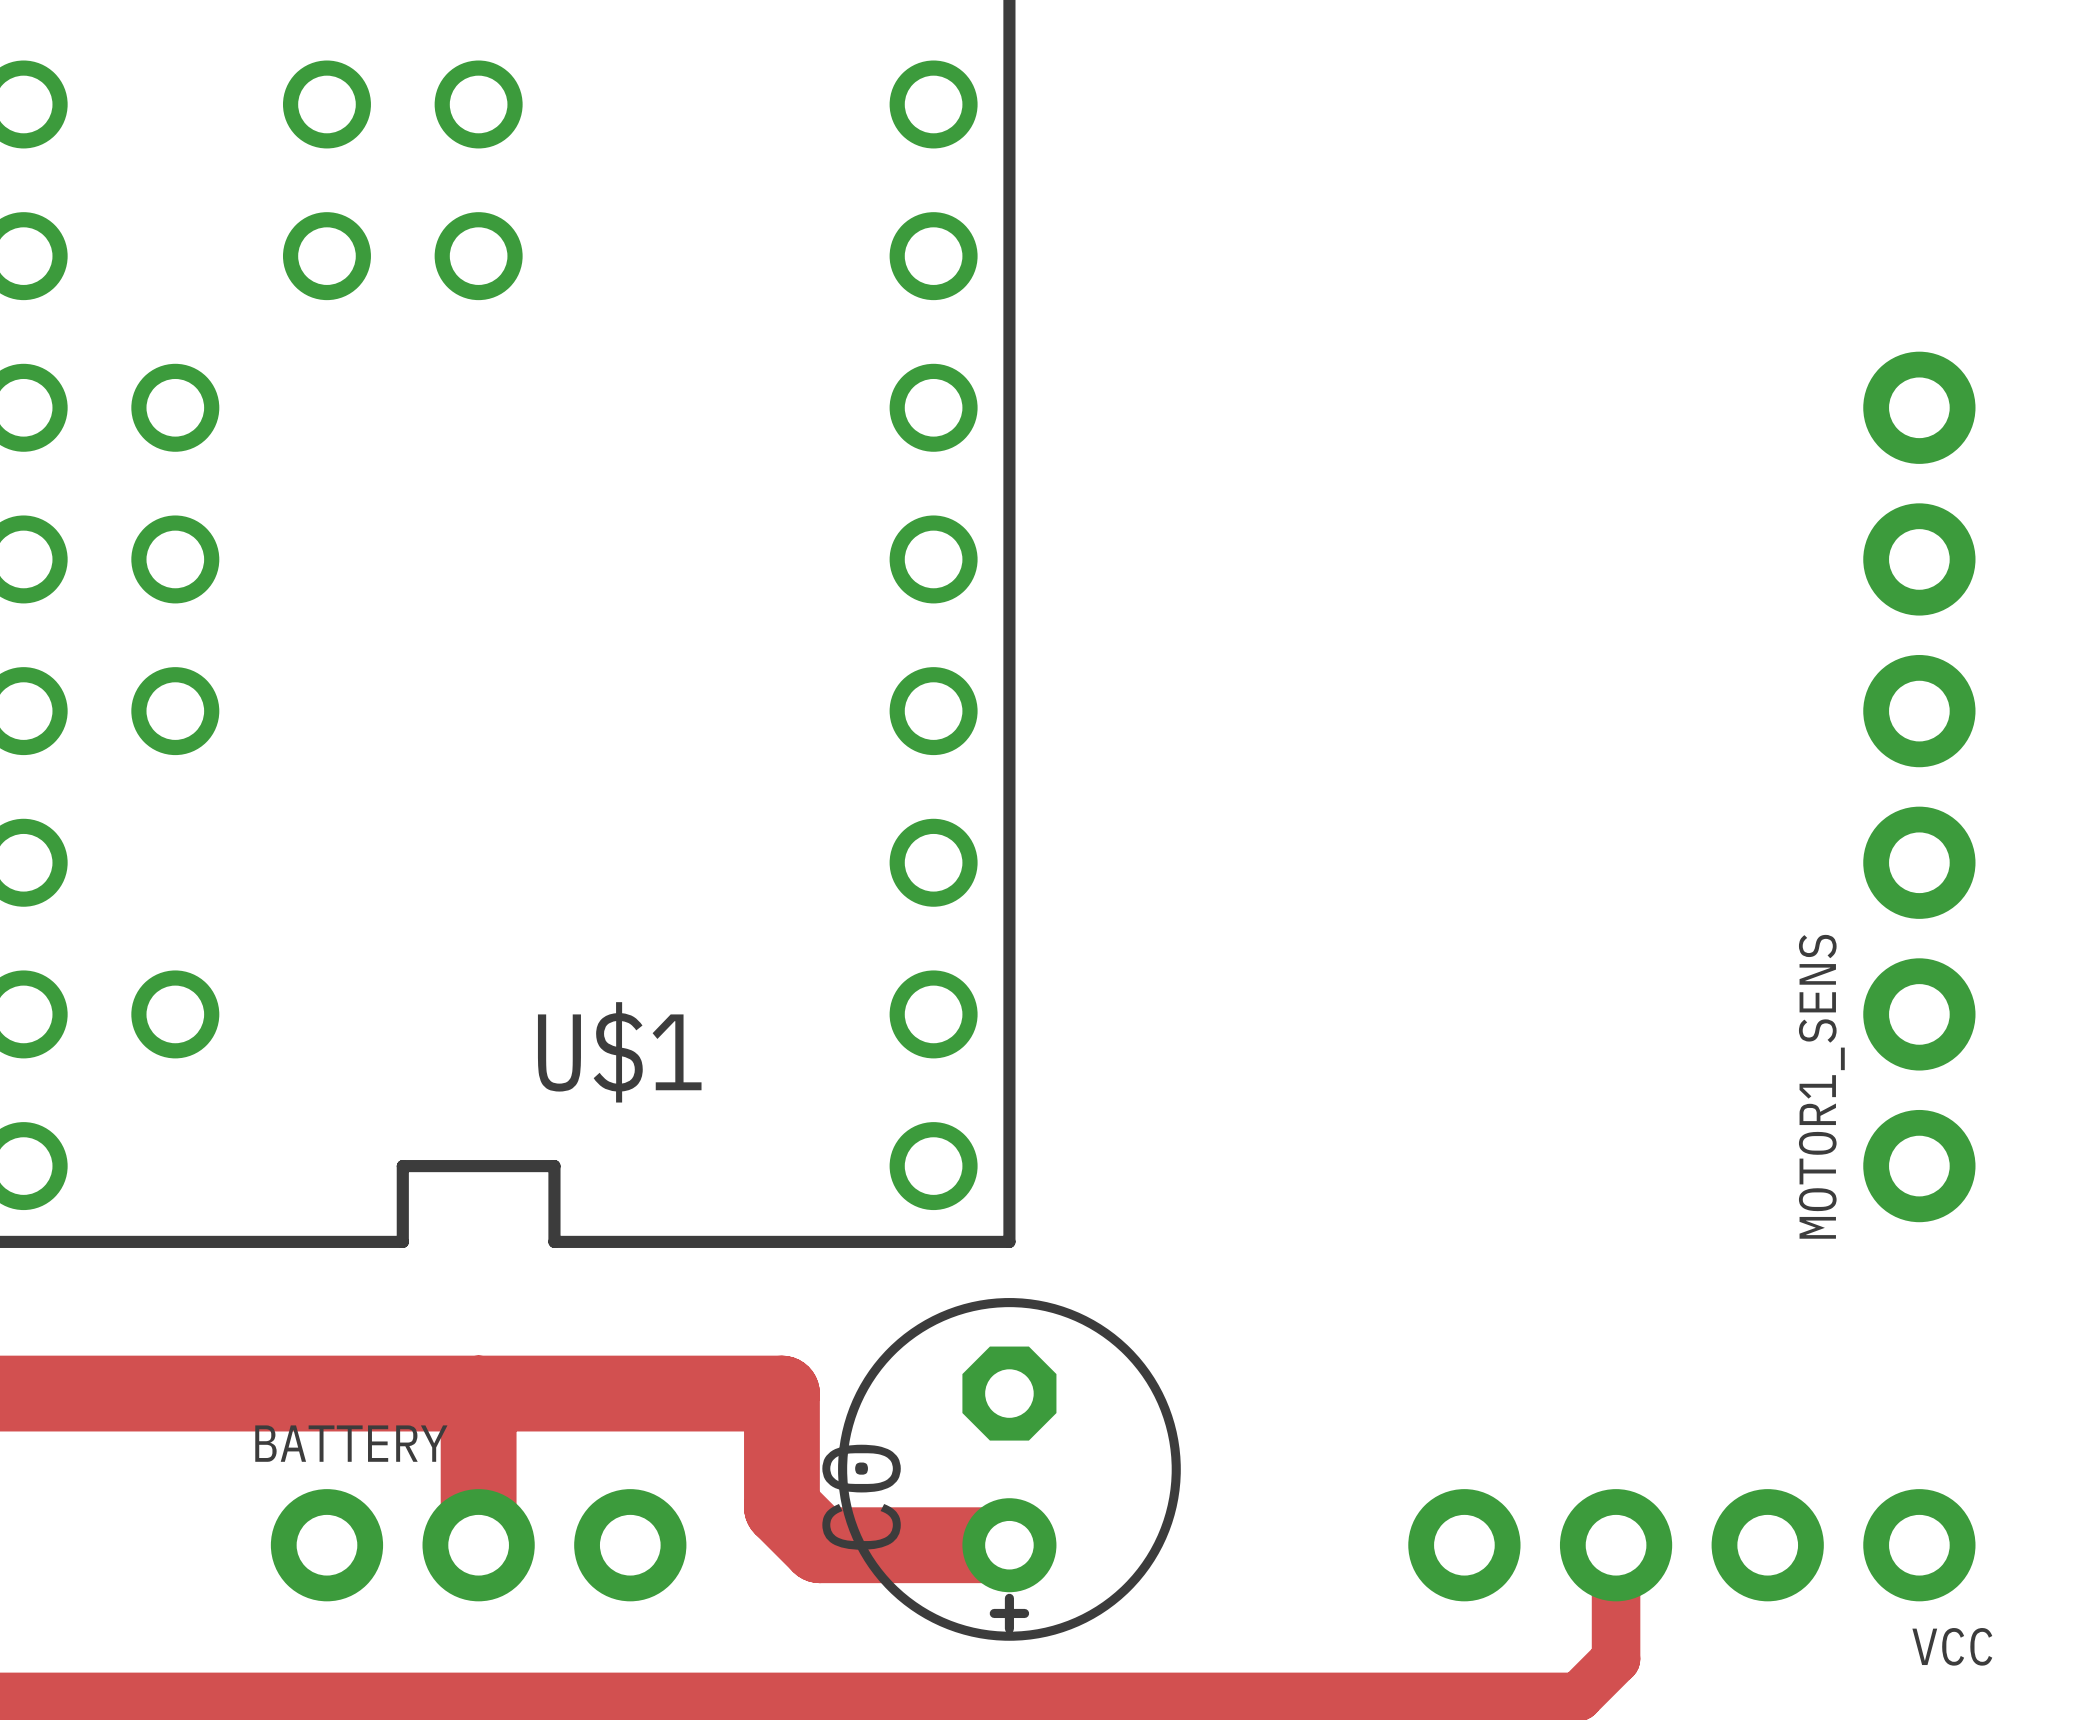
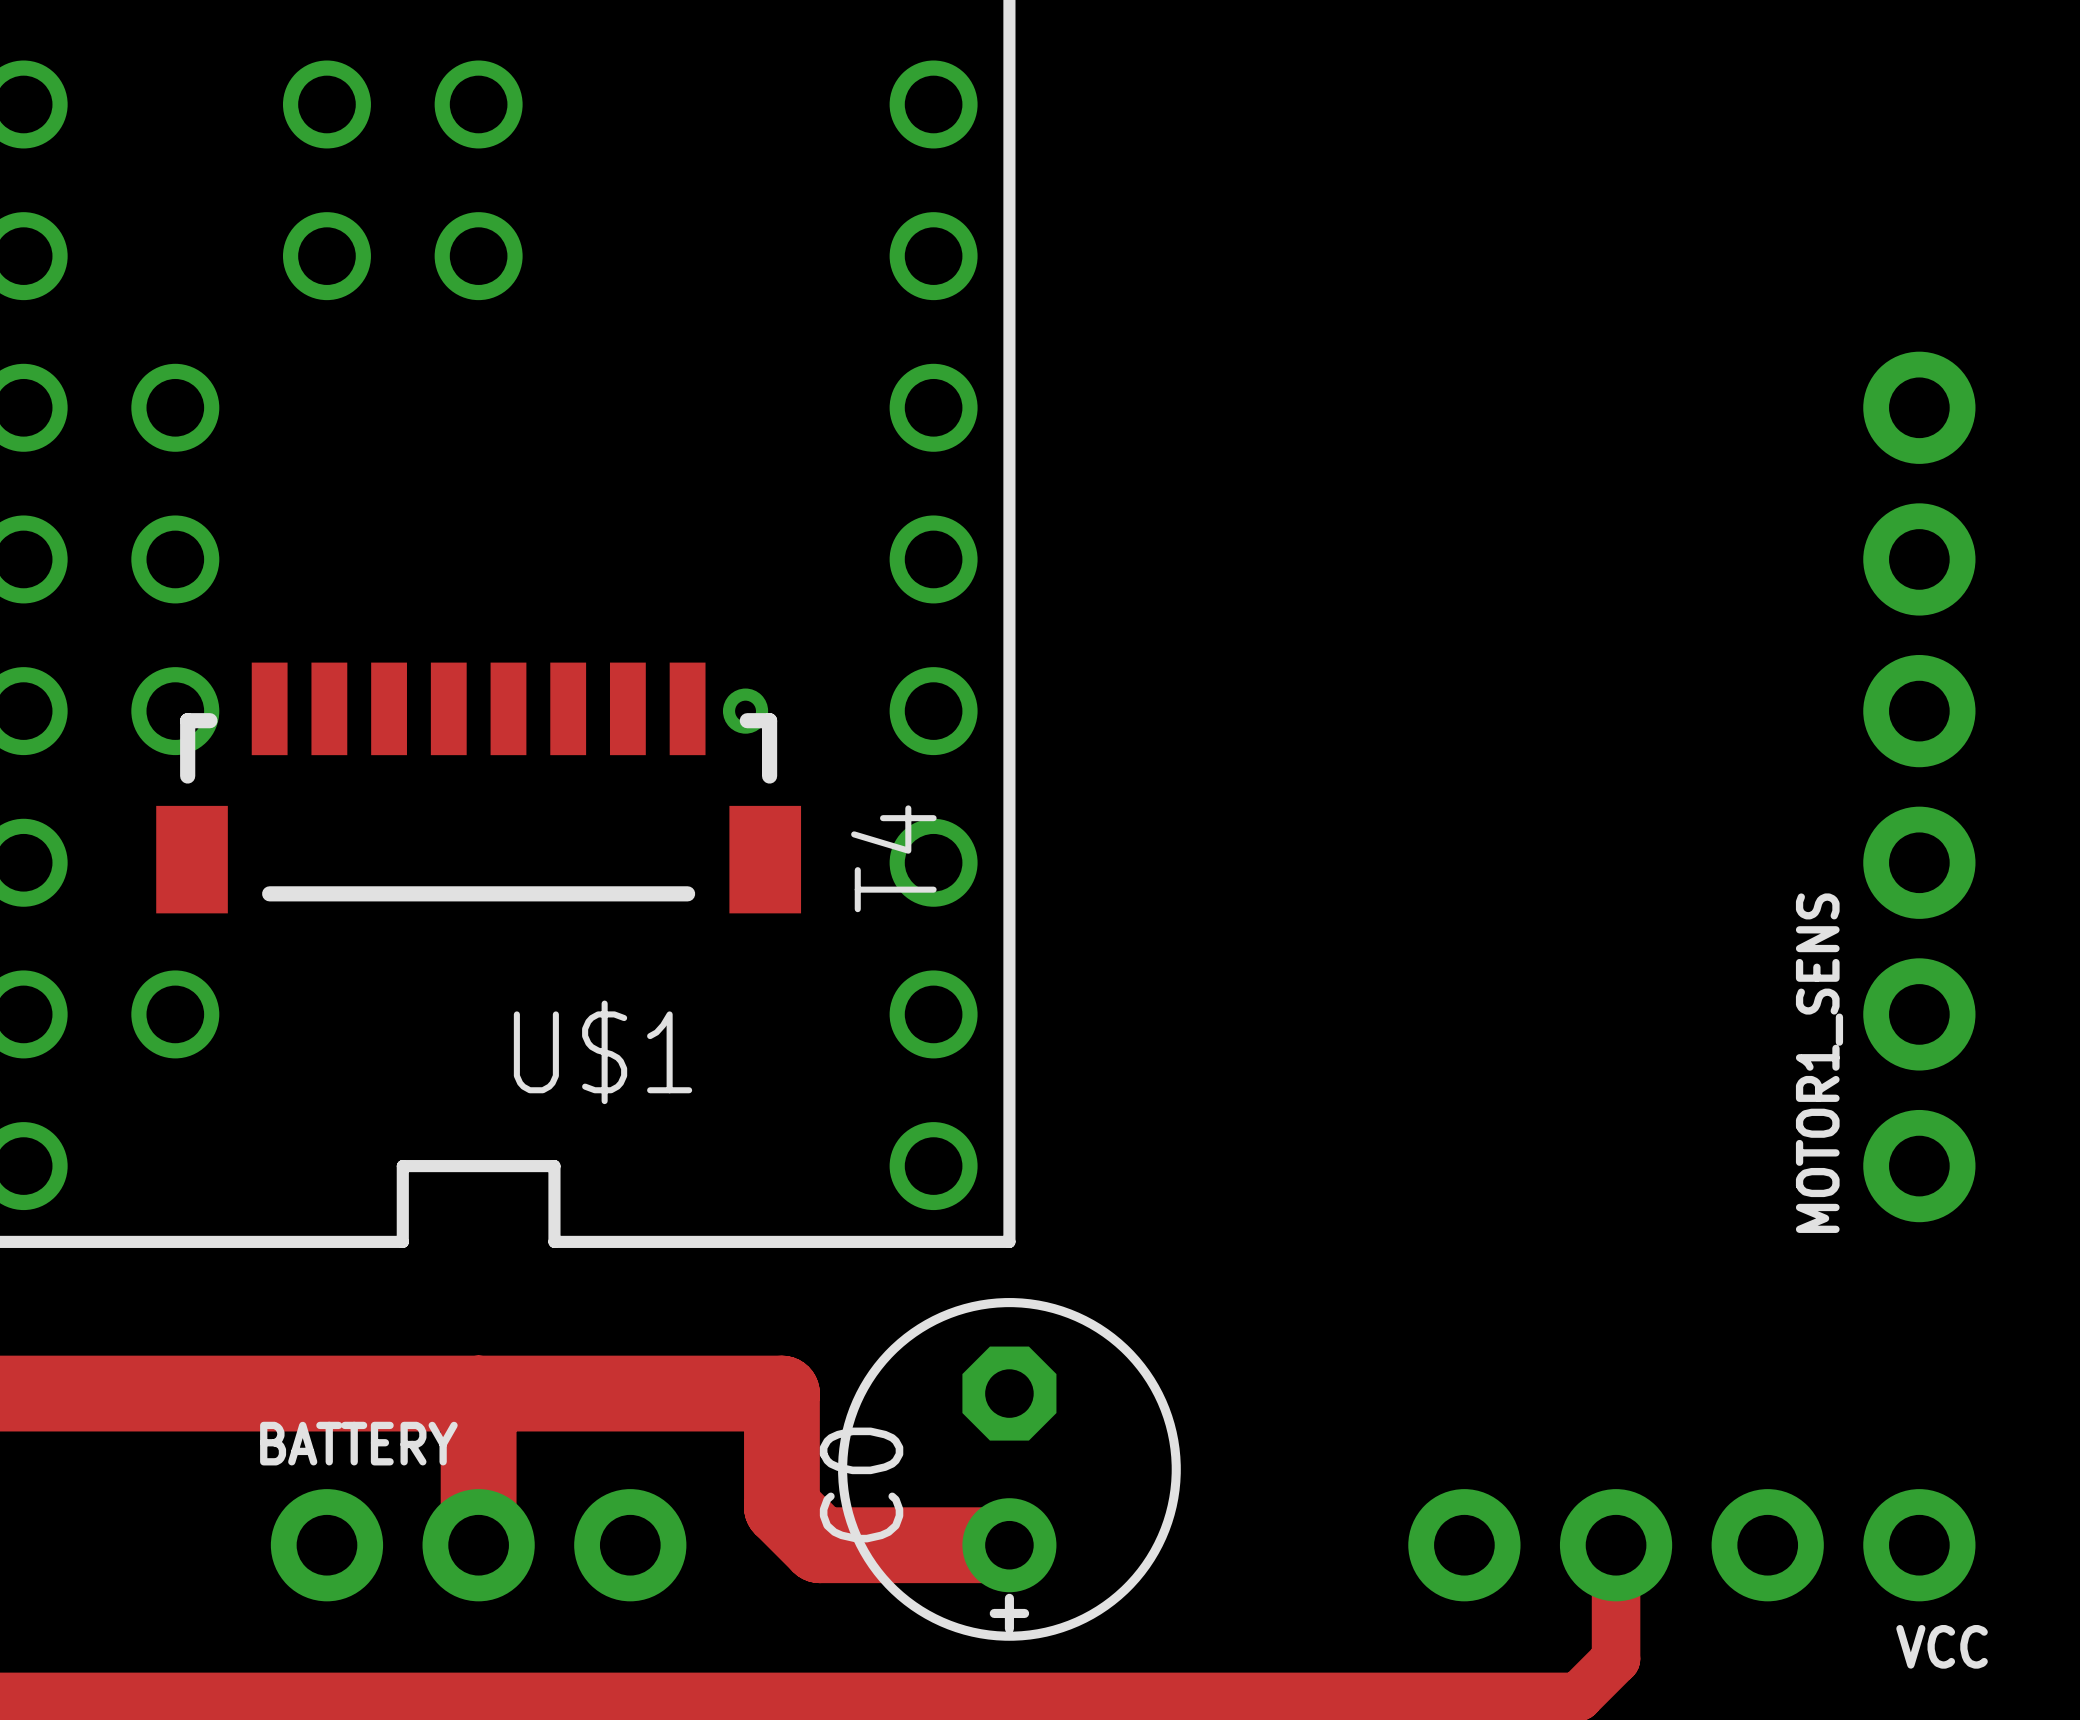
via: none -> (745, 711)
T4: none -> (478, 787)

